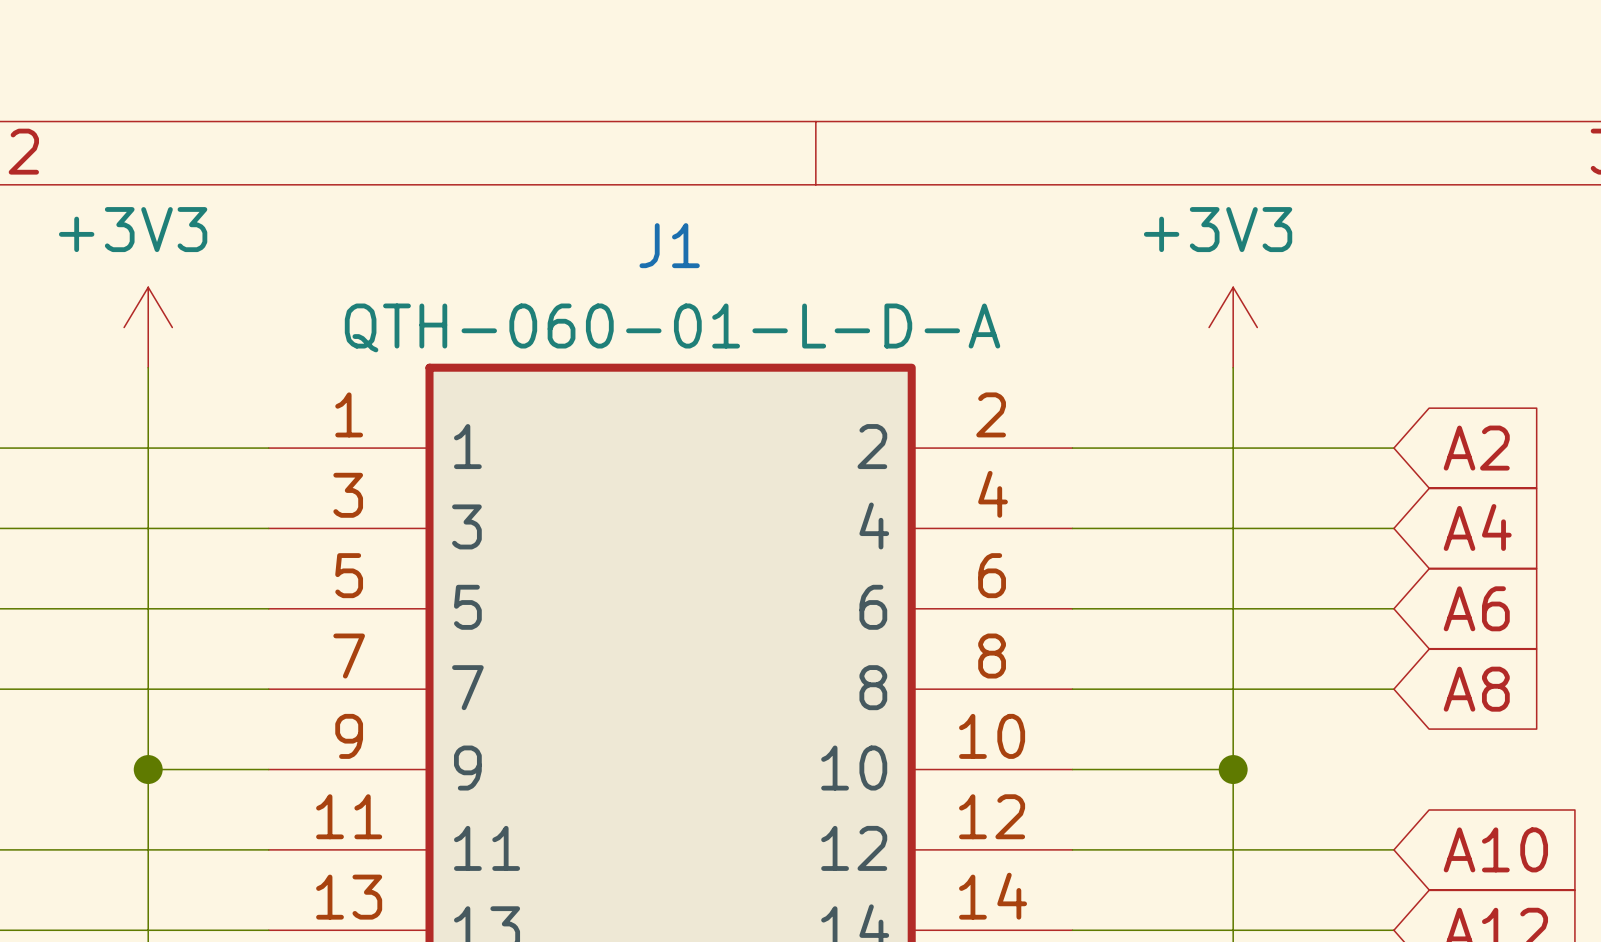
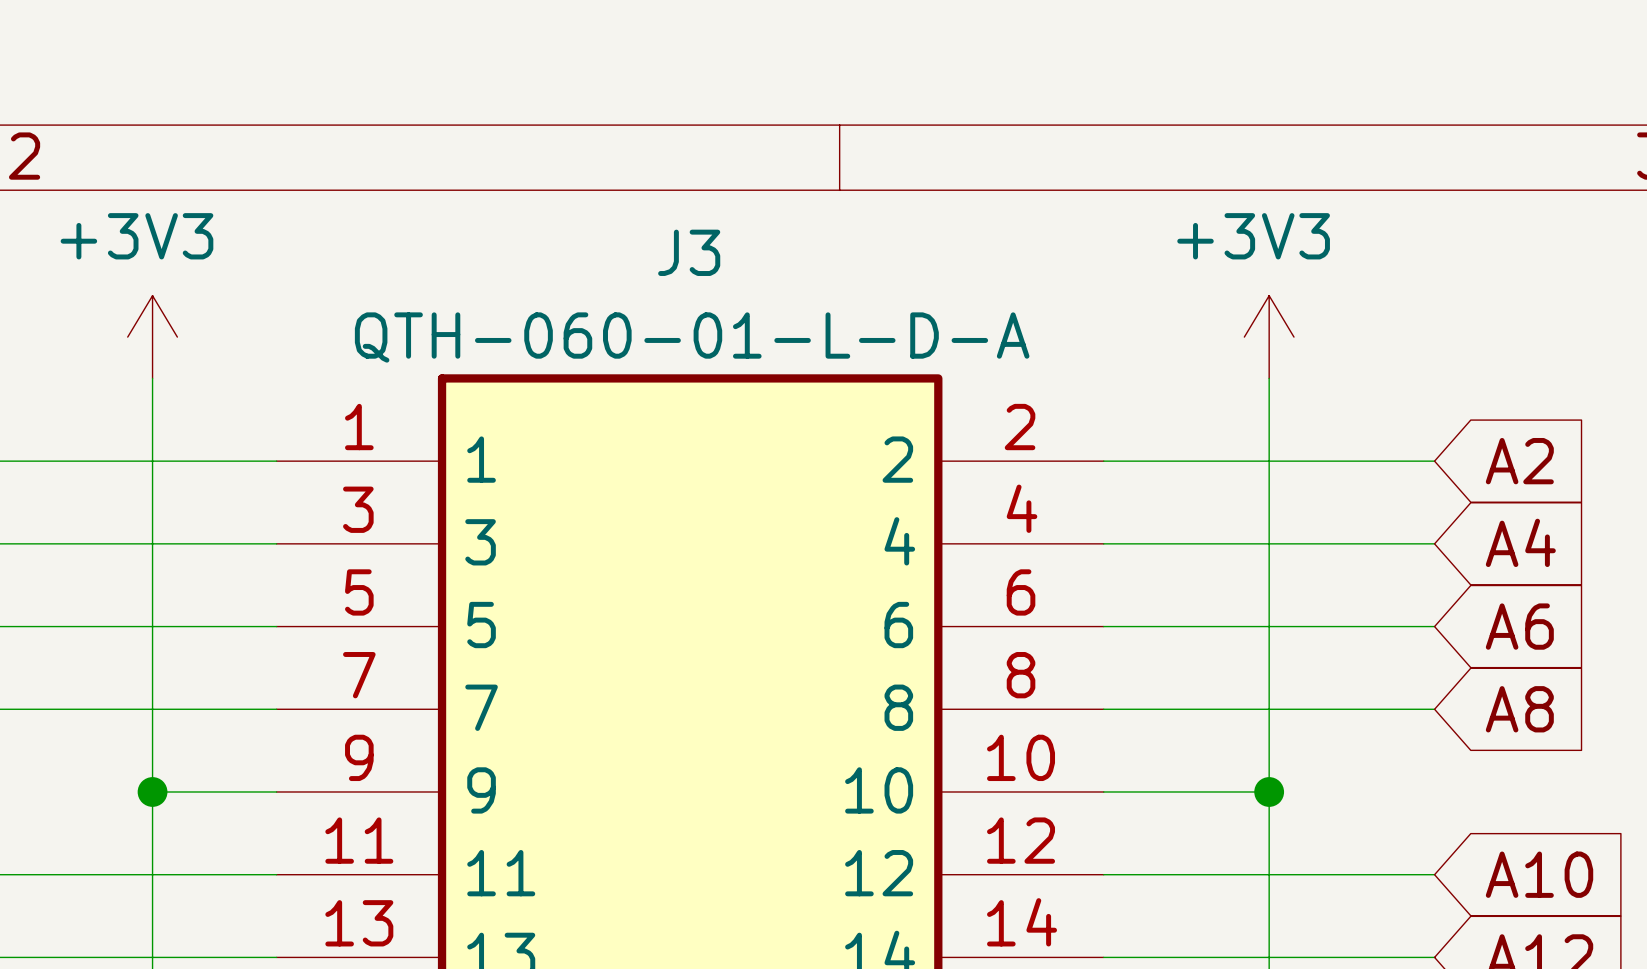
J1 name: J1 (669, 245) -> J3 (689, 252)

